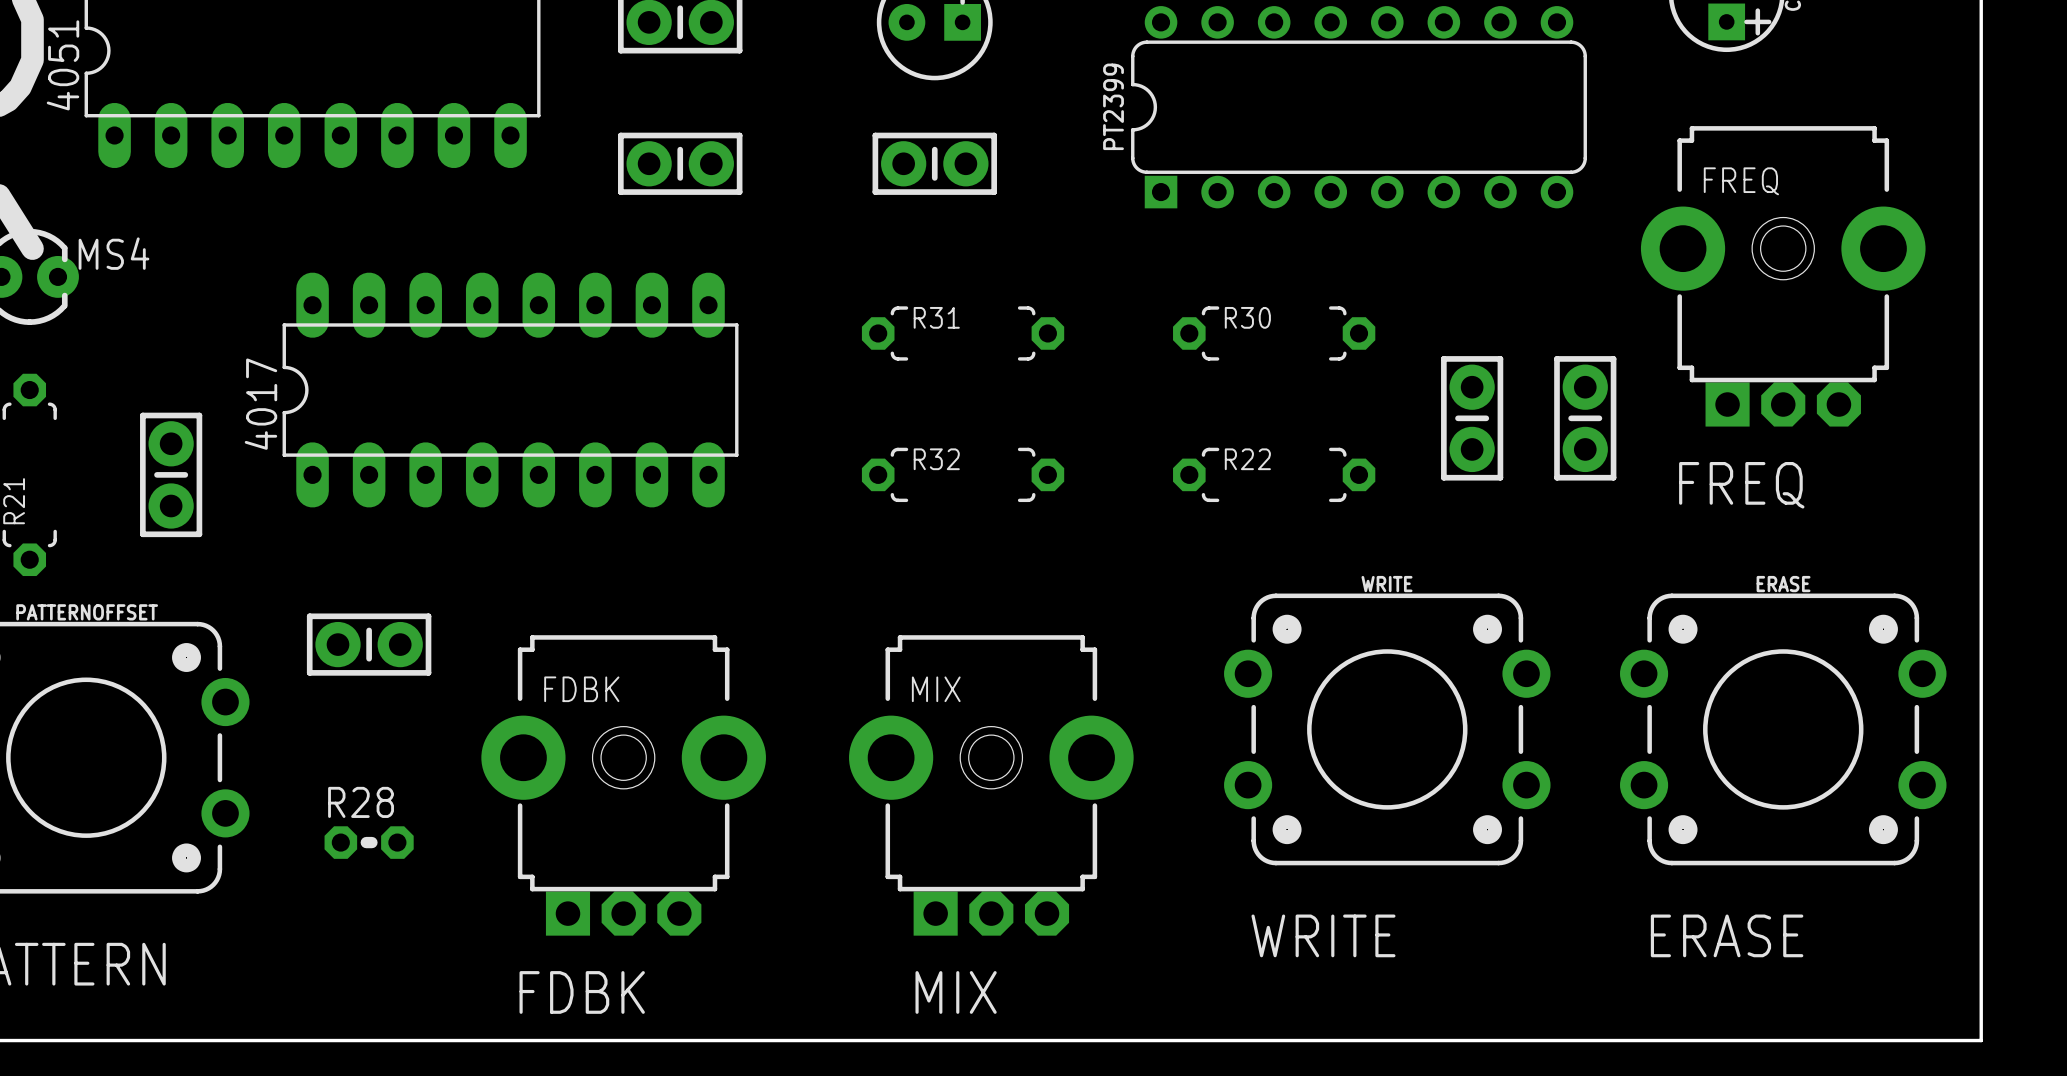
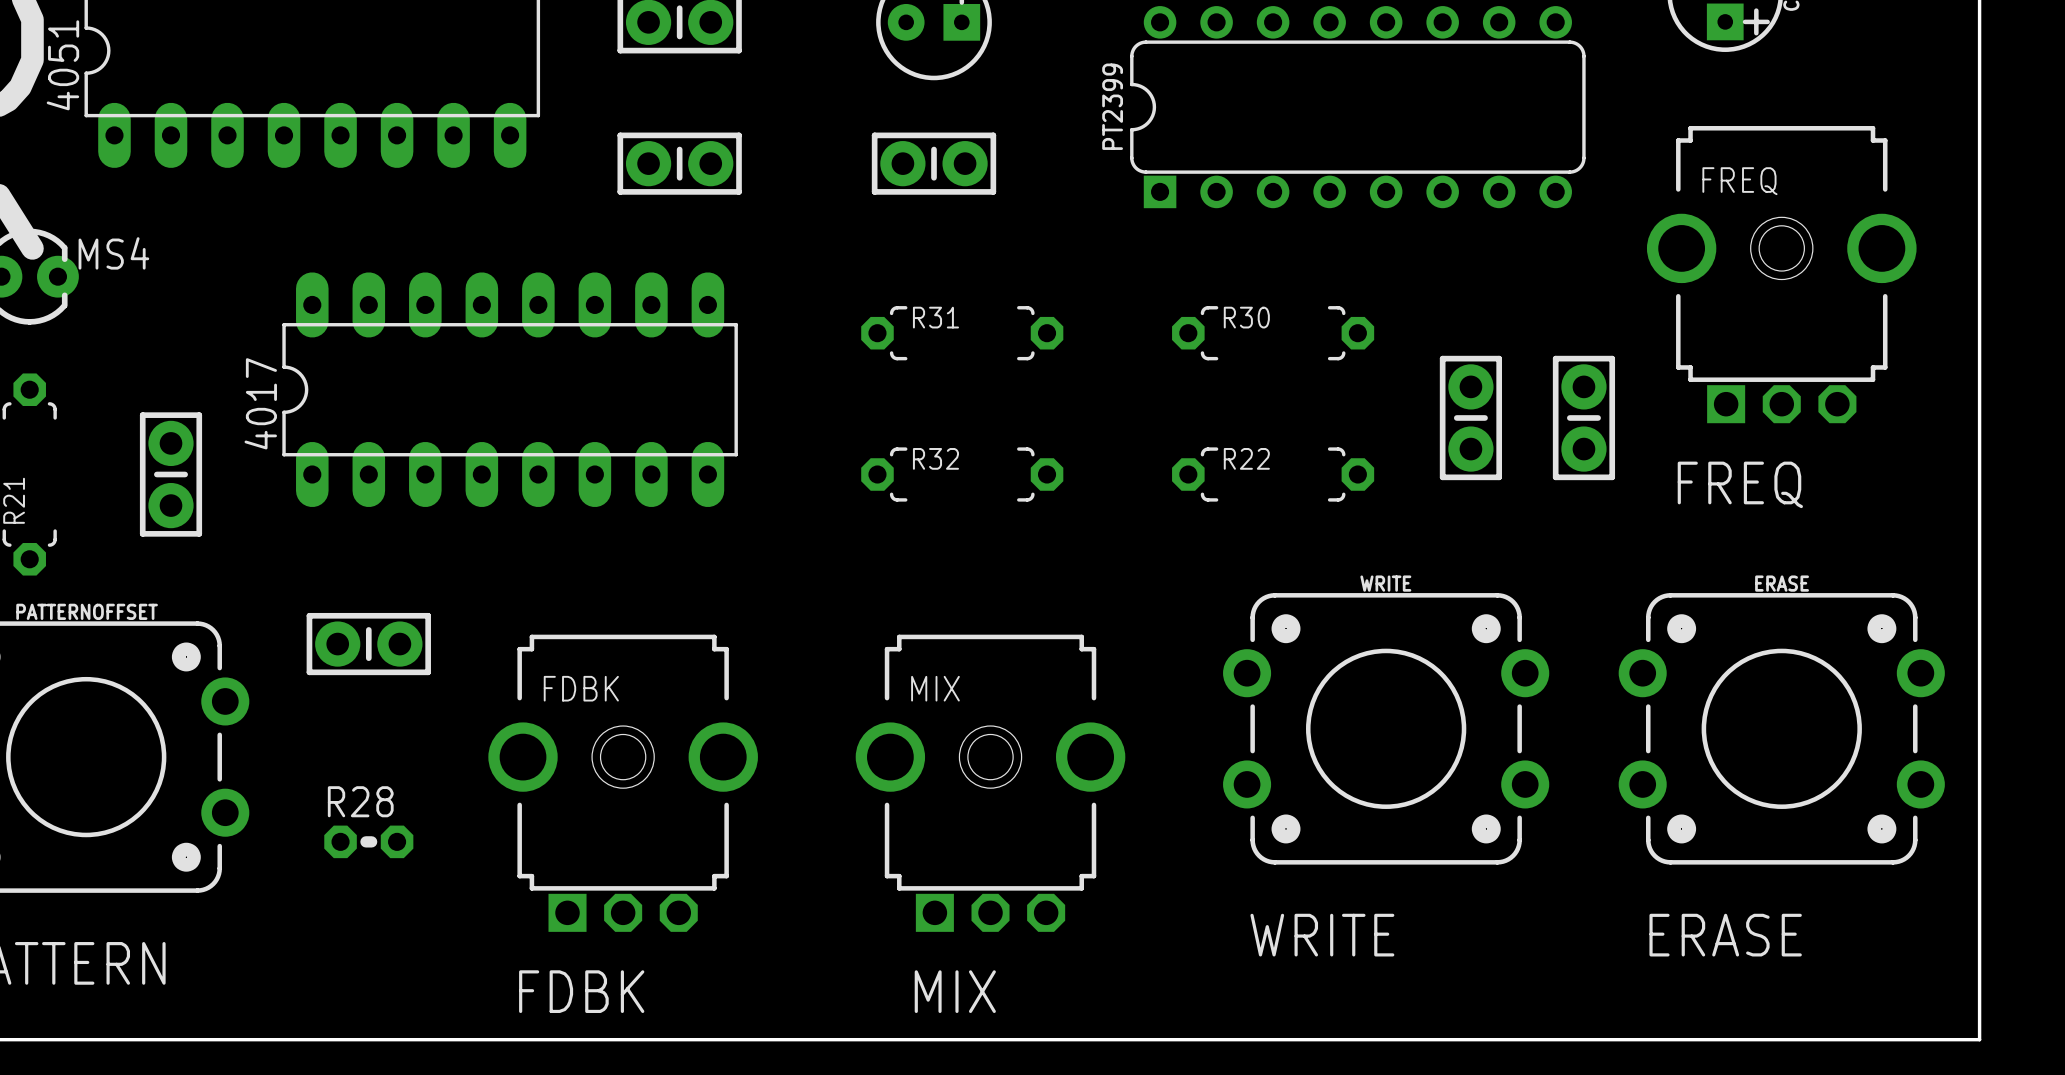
FREQ footprint: [1640, 126, 1926, 427] -> [1646, 126, 1917, 424]
FDBK footprint: [481, 635, 766, 936] -> [488, 634, 758, 932]
MIX footprint: [849, 635, 1134, 936] -> [855, 634, 1126, 932]

